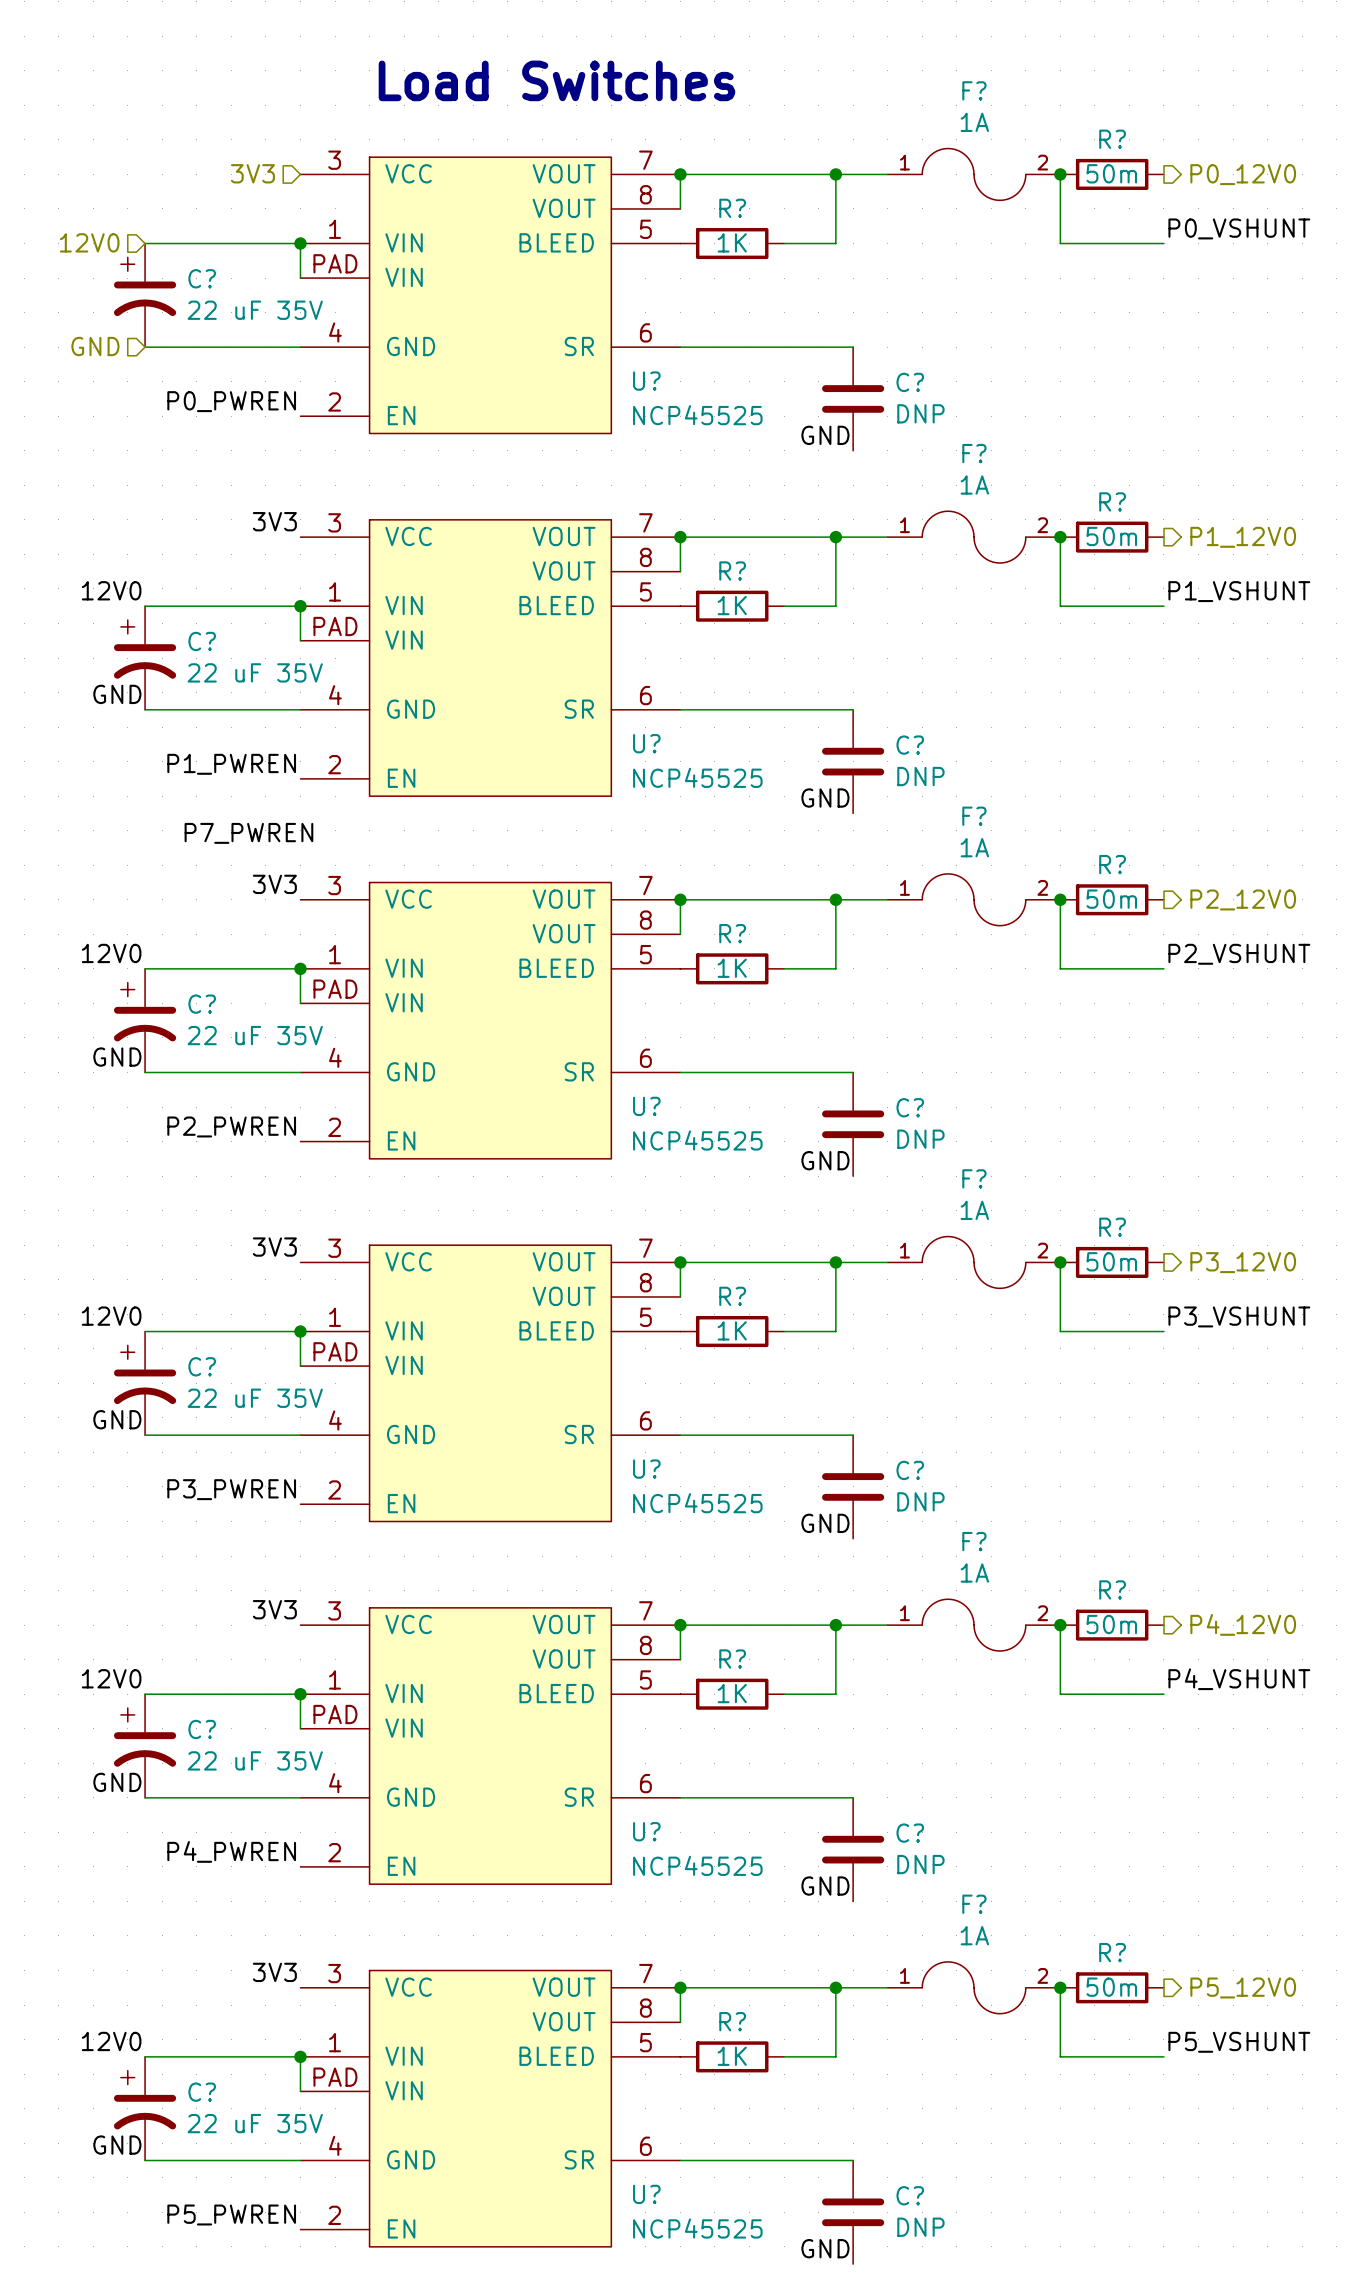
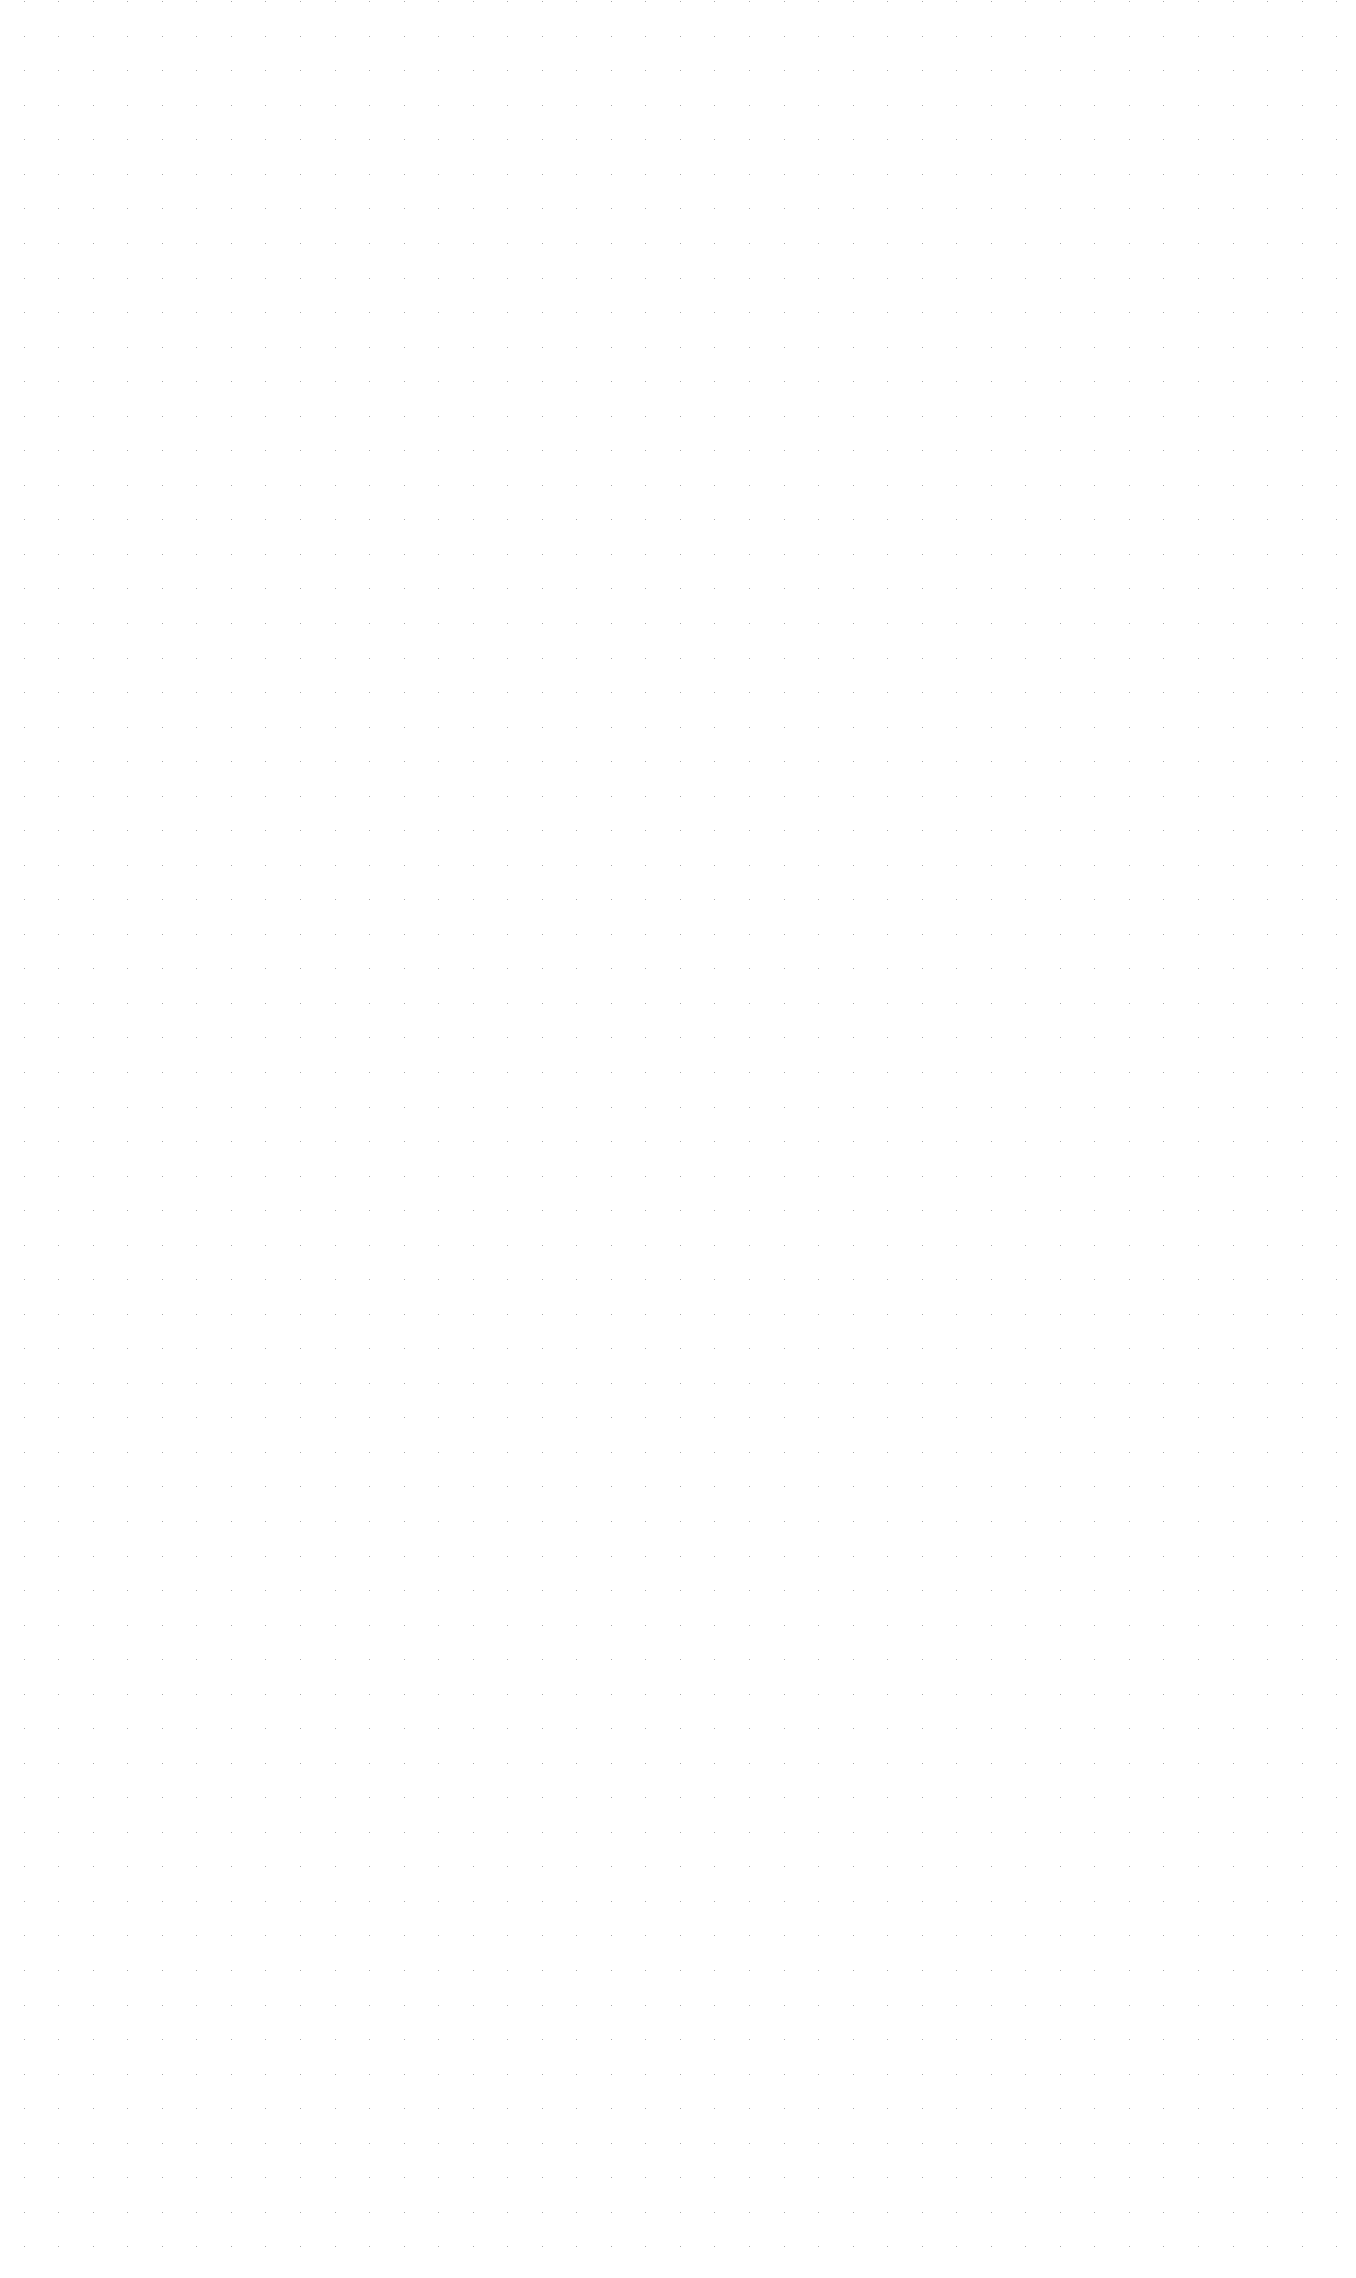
text: Load Switches (556, 80) -> none
hierarchical label: 3V3 (252, 173) -> none
junction: (680, 174) -> none
wire: (835, 174) (835, 243) (784, 243) -> none
junction: (835, 174) -> none
wire: (887, 174) (680, 174) (680, 208) -> none
F?: 1A (974, 174) -> none
wire: (1060, 174) (1060, 243) (1163, 243) -> none
junction: (1060, 174) -> none
R?: 50m (1112, 174) -> none
hierarchical label: P0_12V0 (1243, 174) -> none
label: P0_VSHUNT (1239, 228) -> none
hierarchical label: 12V0 (89, 242) -> none
wire: (145, 243) (300, 243) (300, 278) -> none
junction: (300, 243) -> none
R?: 1K (732, 243) -> none
C?: 22 uF 35V (145, 295) -> none
U?: NCP45525 (490, 295) -> none
hierarchical label: GND (95, 346) -> none
wire: (145, 347) (300, 347) -> none
wire: (680, 347) (853, 347) -> none
C?: DNP (853, 398) -> none
label: P0_PWREN (231, 401) -> none
label: GND (825, 435) -> none
label: 3V3 (274, 521) -> none
junction: (680, 537) -> none
wire: (835, 537) (835, 606) (784, 606) -> none
junction: (835, 537) -> none
wire: (887, 537) (680, 537) (680, 571) -> none
F?: 1A (974, 537) -> none
wire: (1060, 537) (1060, 606) (1163, 606) -> none
junction: (1060, 537) -> none
R?: 50m (1112, 537) -> none
hierarchical label: P1_12V0 (1243, 537) -> none
label: 12V0 (111, 590) -> none
label: P1_VSHUNT (1239, 591) -> none
wire: (145, 606) (300, 606) (300, 640) -> none
junction: (300, 606) -> none
R?: 1K (732, 606) -> none
C?: 22 uF 35V (145, 658) -> none
U?: NCP45525 (490, 658) -> none
label: GND (117, 694) -> none
wire: (145, 709) (300, 709) -> none
wire: (680, 709) (853, 709) -> none
C?: DNP (853, 761) -> none
label: P1_PWREN (231, 764) -> none
label: GND (825, 798) -> none
label: P7_PWREN (248, 833) -> none
label: 3V3 (274, 884) -> none
junction: (680, 899) -> none
wire: (835, 899) (835, 968) (784, 968) -> none
junction: (835, 899) -> none
wire: (887, 899) (680, 899) (680, 934) -> none
F?: 1A (974, 899) -> none
wire: (1060, 899) (1060, 968) (1163, 968) -> none
junction: (1060, 899) -> none
R?: 50m (1112, 899) -> none
hierarchical label: P2_12V0 (1243, 899) -> none
label: 12V0 (111, 953) -> none
label: P2_VSHUNT (1239, 954) -> none
wire: (145, 968) (300, 968) (300, 1003) -> none
junction: (300, 968) -> none
R?: 1K (732, 968) -> none
C?: 22 uF 35V (145, 1020) -> none
U?: NCP45525 (490, 1020) -> none
label: GND (117, 1057) -> none
wire: (145, 1072) (300, 1072) -> none
wire: (680, 1072) (853, 1072) -> none
C?: DNP (853, 1124) -> none
label: P2_PWREN (231, 1126) -> none
label: GND (825, 1160) -> none
label: 3V3 (274, 1247) -> none
junction: (680, 1262) -> none
wire: (835, 1262) (835, 1331) (784, 1331) -> none
junction: (835, 1262) -> none
wire: (887, 1262) (680, 1262) (680, 1297) -> none
F?: 1A (974, 1262) -> none
wire: (1060, 1262) (1060, 1331) (1163, 1331) -> none
junction: (1060, 1262) -> none
R?: 50m (1112, 1262) -> none
hierarchical label: P3_12V0 (1243, 1262) -> none
label: 12V0 (111, 1316) -> none
label: P3_VSHUNT (1239, 1316) -> none
wire: (145, 1331) (300, 1331) (300, 1366) -> none
junction: (300, 1331) -> none
R?: 1K (732, 1331) -> none
C?: 22 uF 35V (145, 1383) -> none
U?: NCP45525 (490, 1383) -> none
label: GND (117, 1419) -> none
wire: (145, 1435) (300, 1435) -> none
wire: (680, 1435) (853, 1435) -> none
C?: DNP (853, 1486) -> none
label: P3_PWREN (231, 1489) -> none
label: GND (825, 1523) -> none
label: 3V3 (274, 1609) -> none
hierarchical label: P4_12V0 (1243, 1624) -> none
junction: (680, 1625) -> none
wire: (835, 1625) (835, 1694) (784, 1694) -> none
junction: (835, 1625) -> none
wire: (887, 1625) (680, 1625) (680, 1659) -> none
F?: 1A (974, 1625) -> none
wire: (1060, 1625) (1060, 1694) (1163, 1694) -> none
junction: (1060, 1625) -> none
R?: 50m (1112, 1625) -> none
label: 12V0 (111, 1678) -> none
label: P4_VSHUNT (1239, 1679) -> none
wire: (145, 1694) (300, 1694) (300, 1728) -> none
junction: (300, 1694) -> none
R?: 1K (732, 1694) -> none
C?: 22 uF 35V (145, 1746) -> none
U?: NCP45525 (490, 1746) -> none
label: GND (117, 1782) -> none
wire: (145, 1797) (300, 1797) -> none
wire: (680, 1797) (853, 1797) -> none
C?: DNP (853, 1849) -> none
label: P4_PWREN (231, 1851) -> none
label: GND (825, 1886) -> none
label: 3V3 (274, 1972) -> none
junction: (680, 1987) -> none
wire: (835, 1987) (835, 2056) (784, 2056) -> none
junction: (835, 1987) -> none
wire: (887, 1987) (680, 1987) (680, 2022) -> none
F?: 1A (974, 1987) -> none
wire: (1060, 1987) (1060, 2056) (1163, 2056) -> none
junction: (1060, 1987) -> none
R?: 50m (1112, 1987) -> none
hierarchical label: P5_12V0 (1243, 1987) -> none
label: 12V0 (111, 2041) -> none
label: P5_VSHUNT (1239, 2042) -> none
wire: (145, 2056) (300, 2056) (300, 2091) -> none
junction: (300, 2056) -> none
R?: 1K (732, 2056) -> none
C?: 22 uF 35V (145, 2108) -> none
U?: NCP45525 (490, 2108) -> none
label: GND (117, 2145) -> none
wire: (145, 2160) (300, 2160) -> none
wire: (680, 2160) (853, 2160) -> none
C?: DNP (853, 2212) -> none
label: P5_PWREN (231, 2214) -> none
label: GND (825, 2248) -> none

